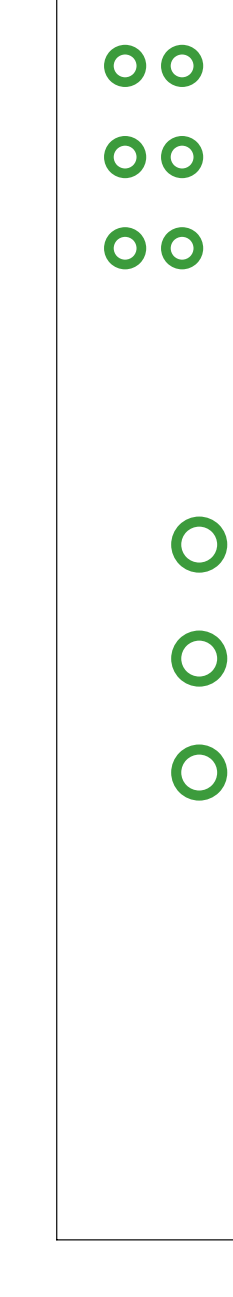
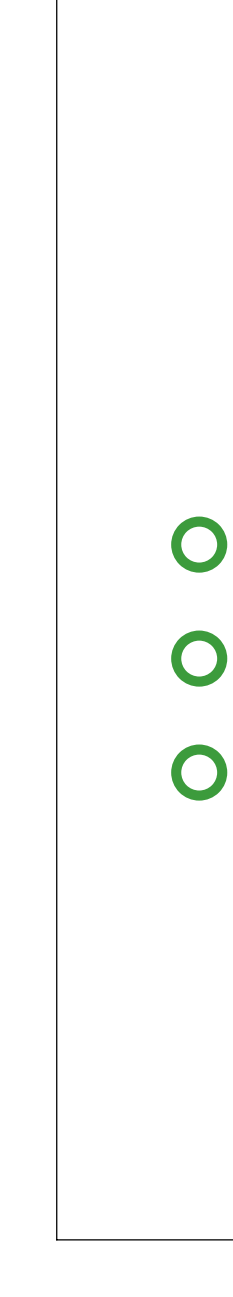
part: (153, 65) -> none
part: (153, 157) -> none
part: (153, 248) -> none

